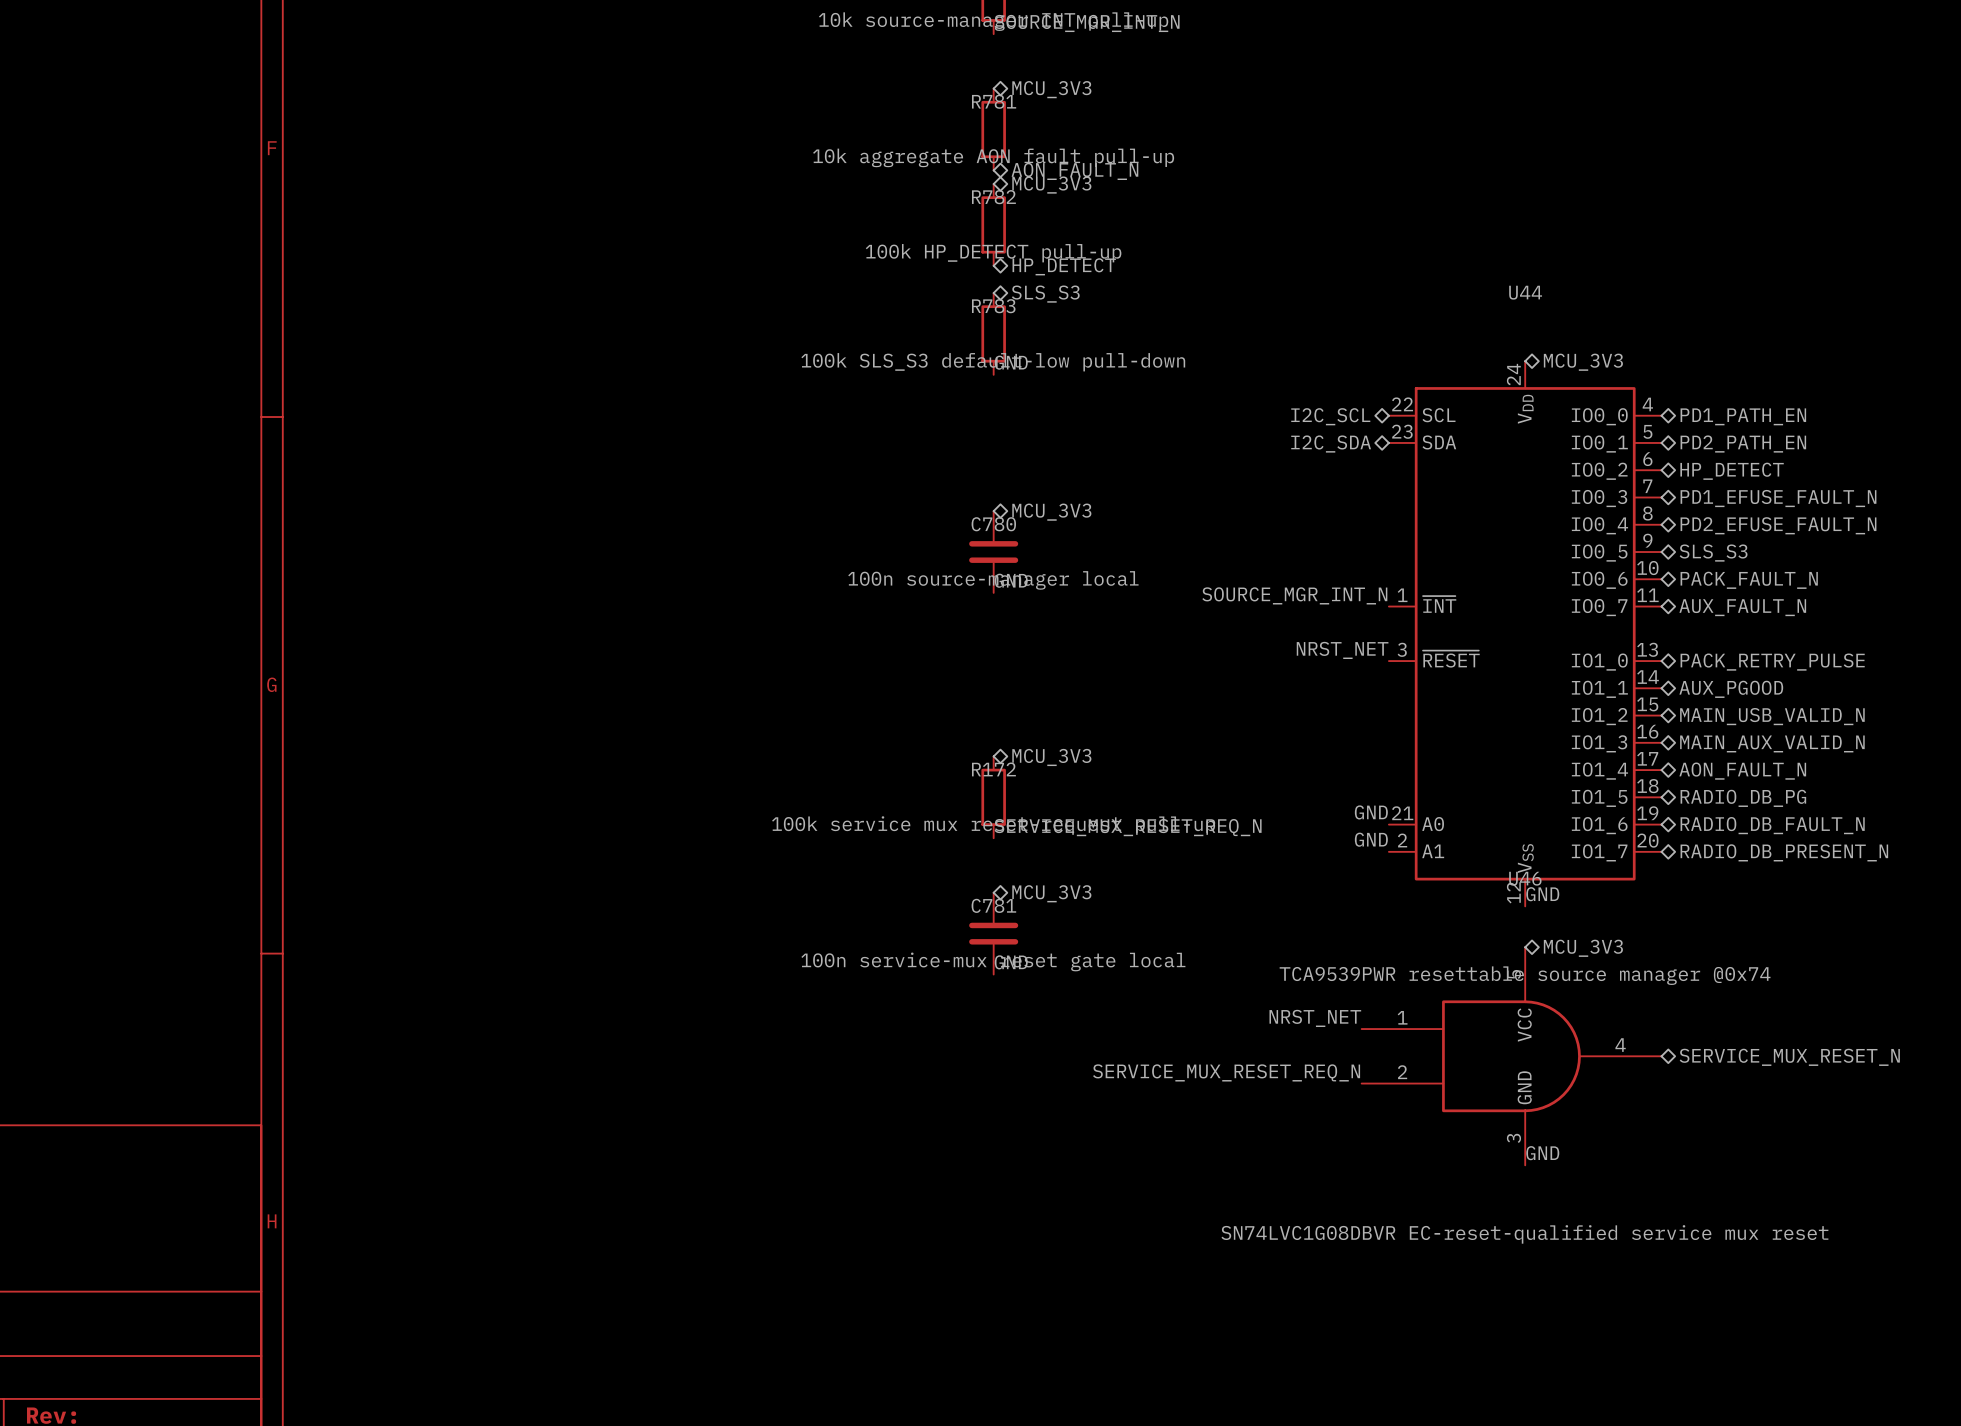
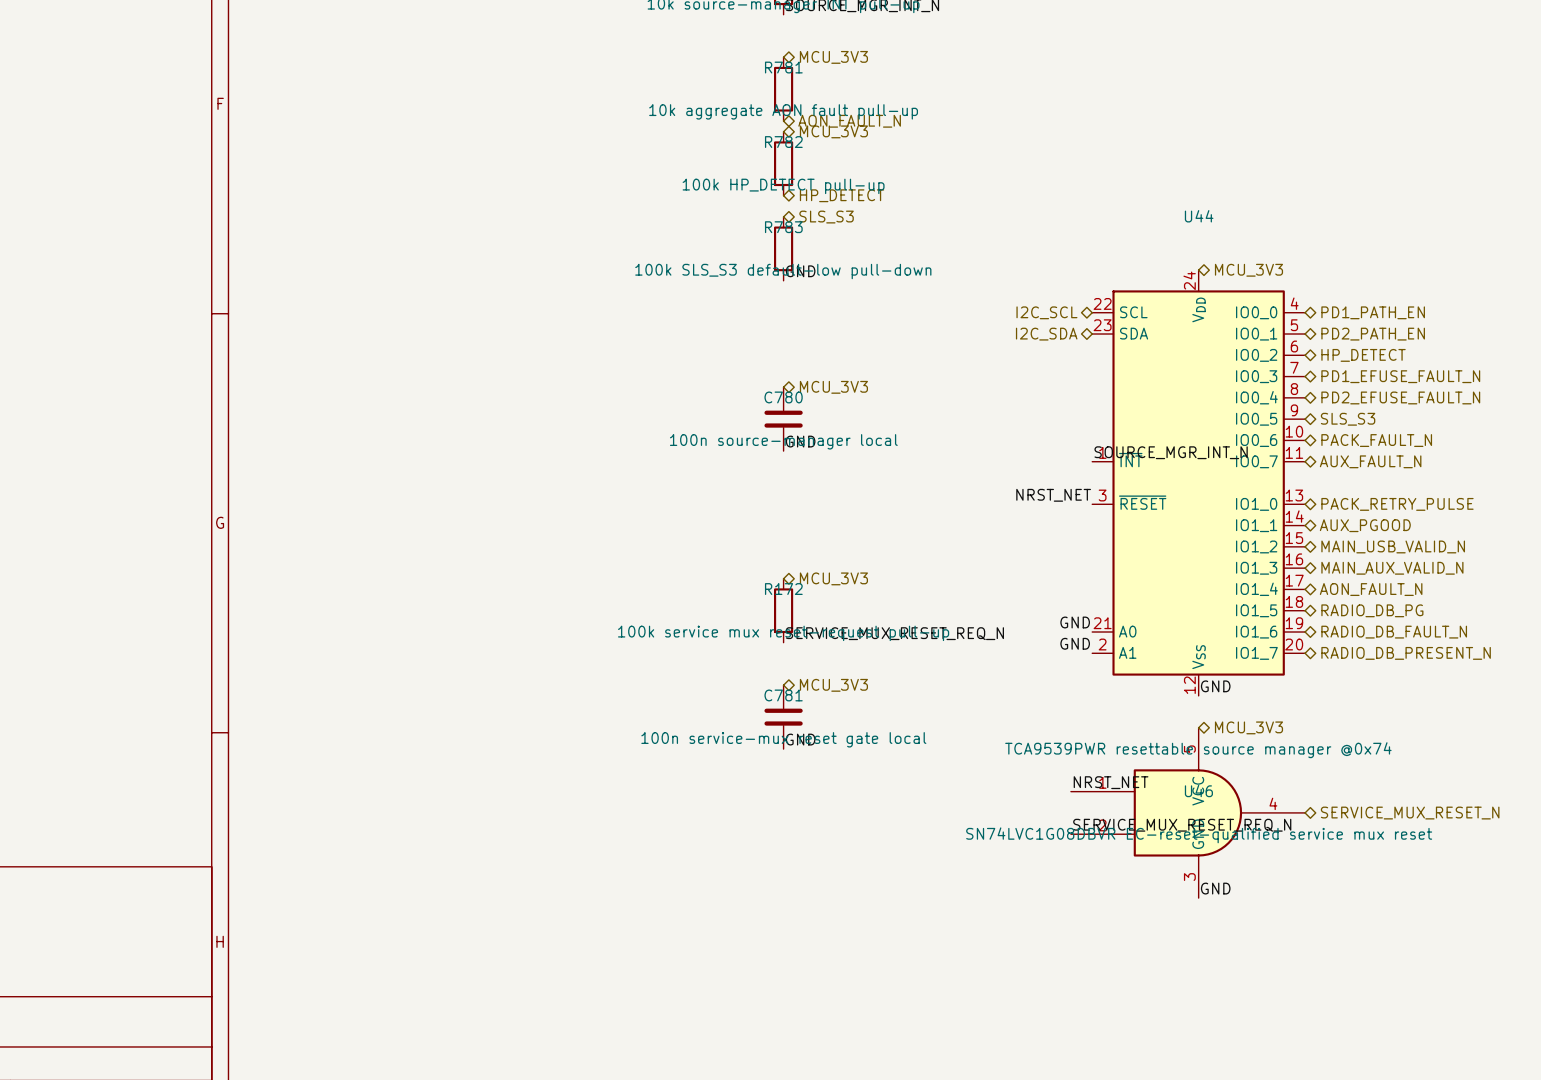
label position: SOURCE_MGR_INT_N (1294, 595) -> SOURCE_MGR_INT_N (1171, 452)
U46 name position: U46 (1525, 878) -> U46 (1198, 790)
label position: NRST_NET (1315, 1018) -> NRST_NET (1111, 782)
label position: SERVICE_MUX_RESET_REQ_N (1226, 1072) -> SERVICE_MUX_RESET_REQ_N (1182, 825)
U46 value position: SN74LVC1G08DBVR EC-reset-qualified service mux reset (1524, 1234) -> SN74LVC1G08DBVR EC-reset-qualified service mux reset (1199, 835)

